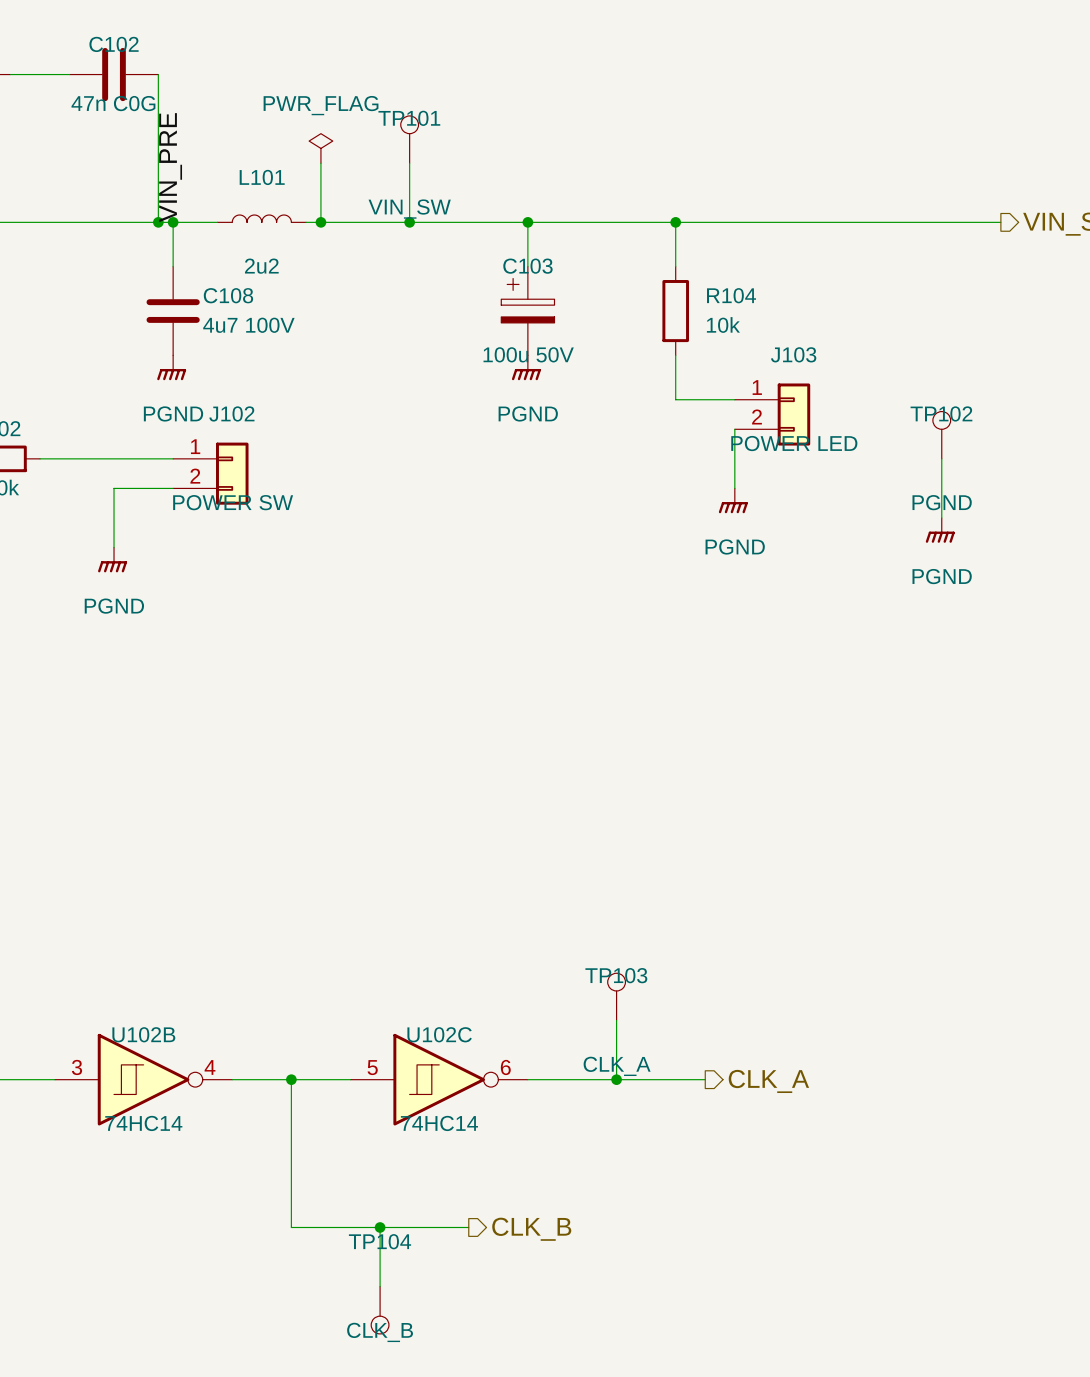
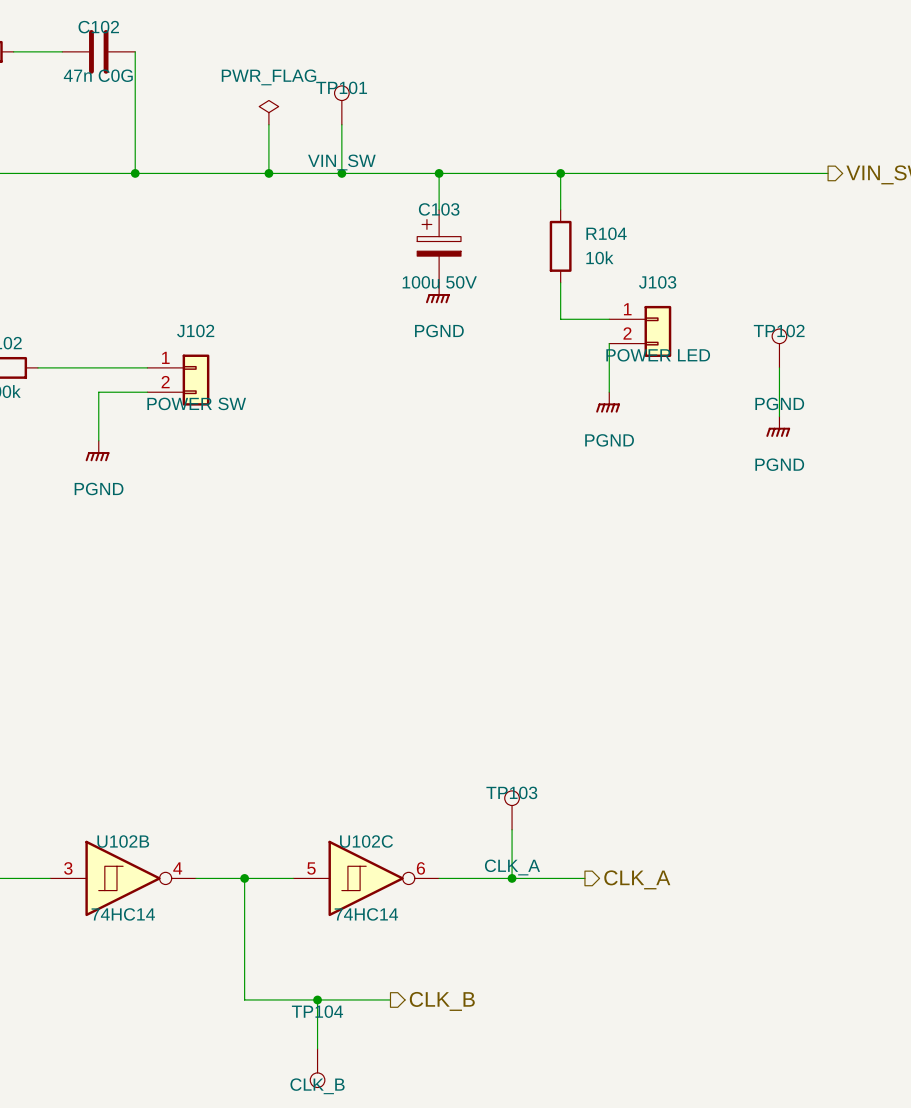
label: VIN_PRE (170, 167) -> none
L101: 2u2 (261, 218) -> none
wire: (173, 222) (173, 266) -> none
junction: (173, 222) -> none
wire: none -> (183, 173) (256, 173)
C108: 4u7 100V (173, 311) -> none
power symbol: PGND (171, 367) -> none

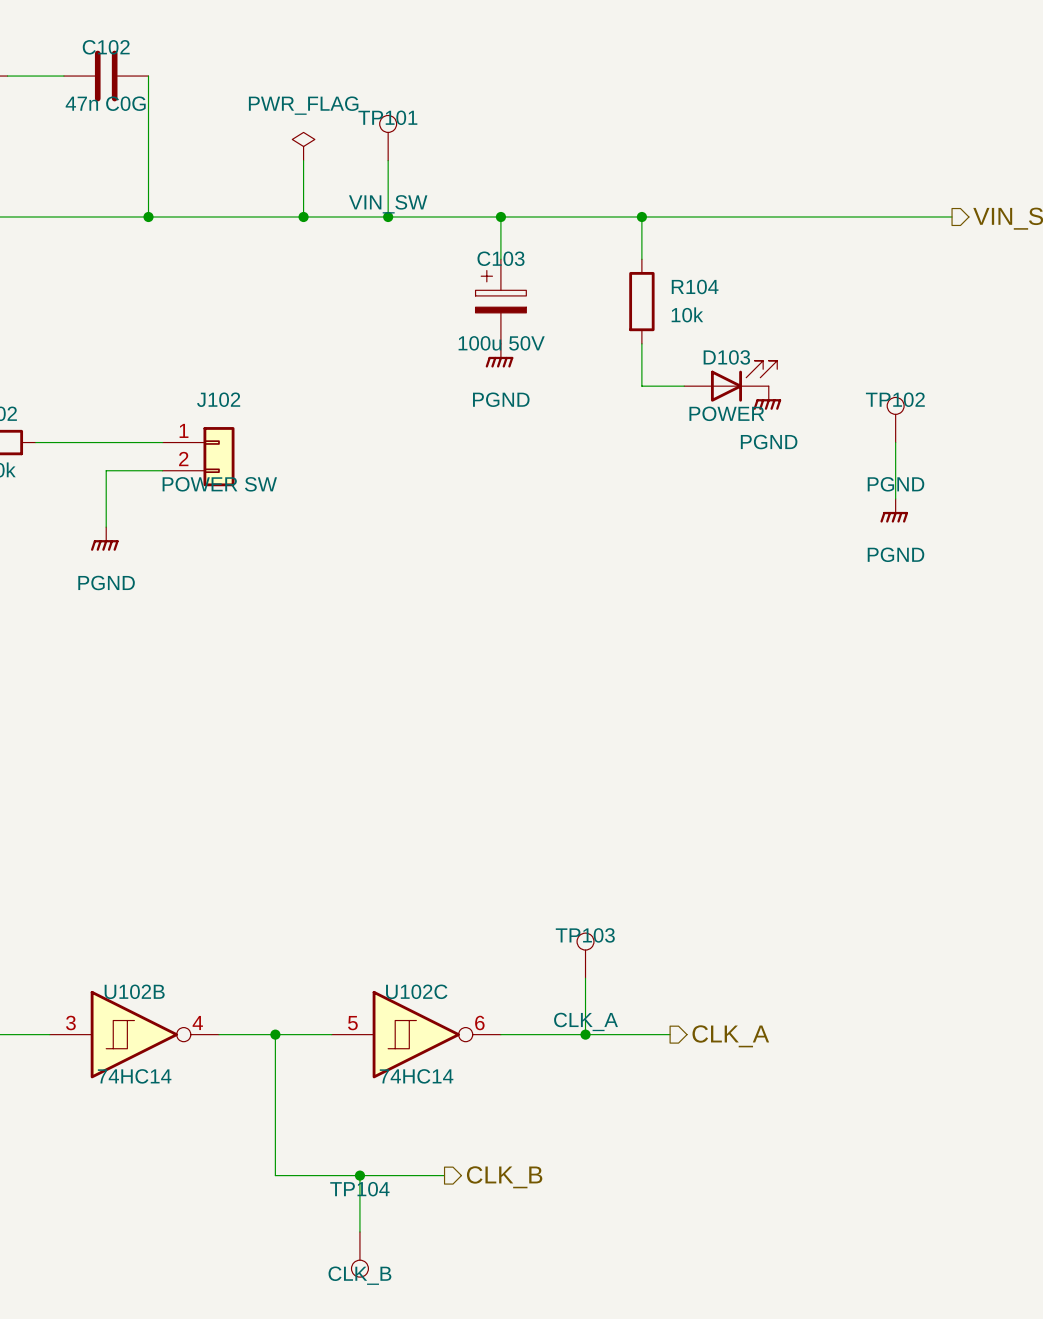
D103: none -> POWER (730, 381)
J103: POWER LED (640, 331) -> none
wire: (609, 343) (609, 392) -> none
power symbol position: PGND (608, 402) -> PGND (767, 398)

